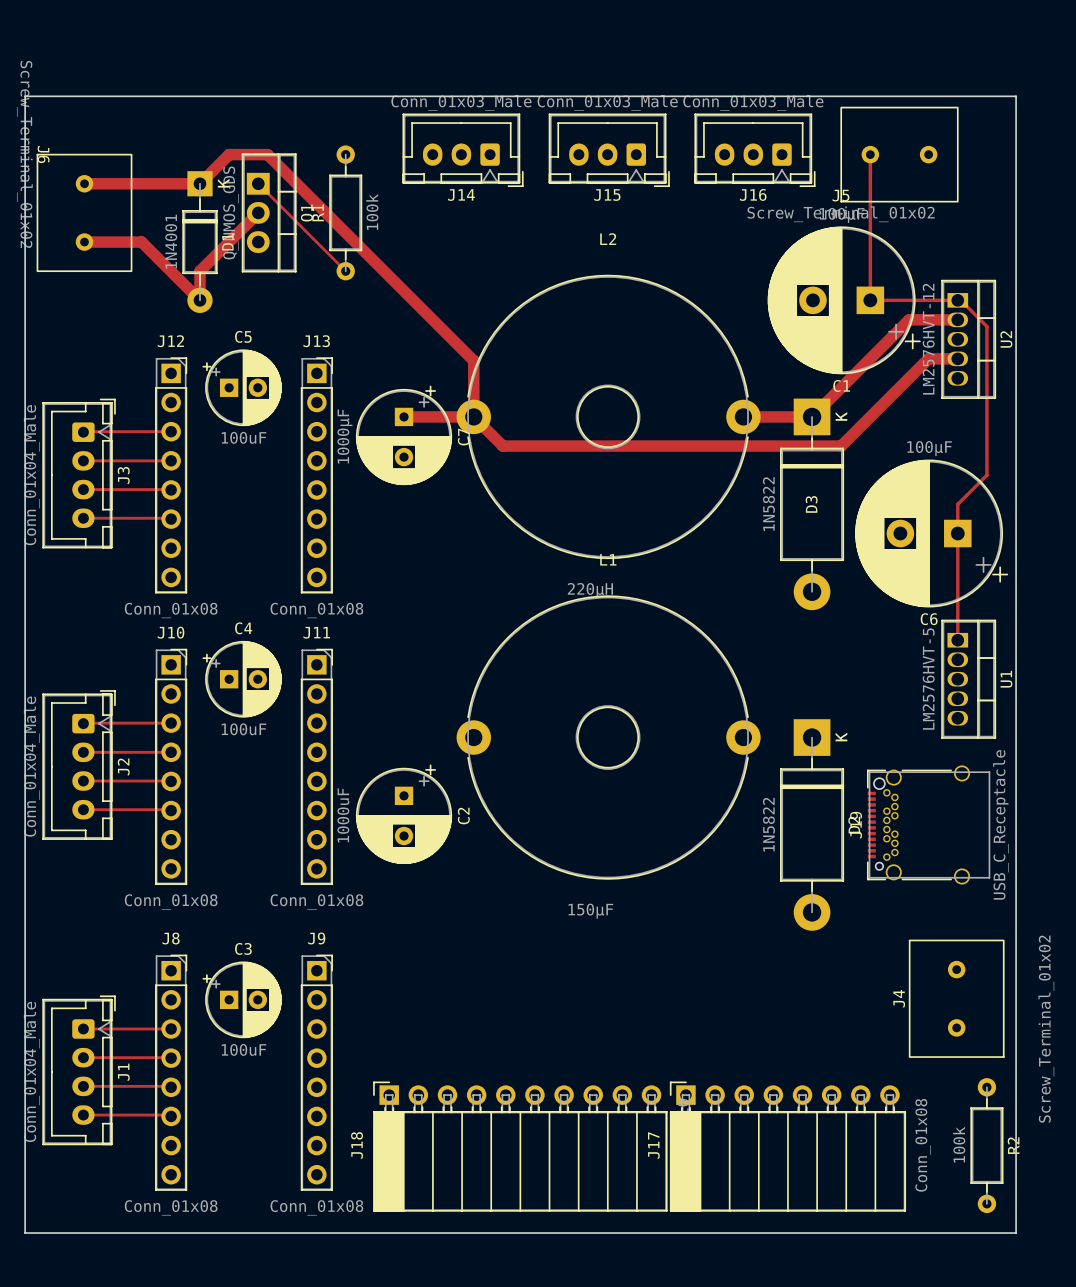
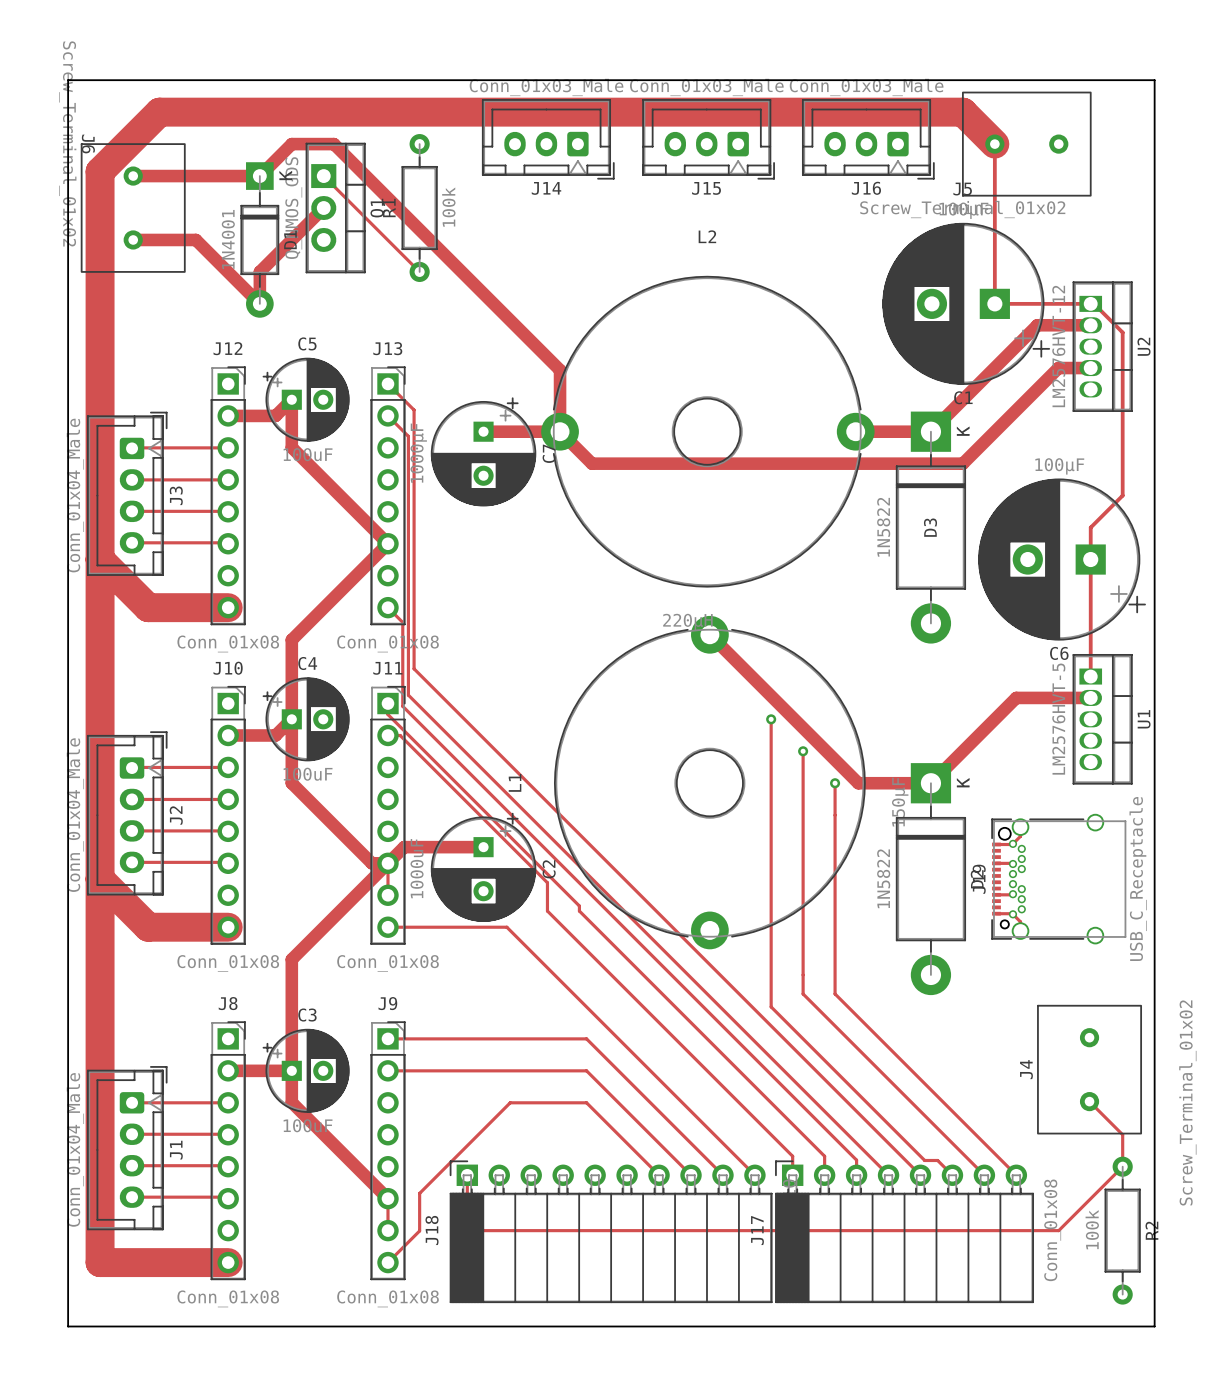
track: none -> (994, 144) (962, 112) (159, 112) (100, 171) (100, 1262) (228, 1262)
track: none -> (387, 383) (414, 410) (414, 668) (920, 1175)
track: none -> (228, 415) (275, 415) (291, 399) (291, 447) (387, 543) (291, 639) (291, 783) (371, 863) (387, 863) (387, 895)
track: none -> (387, 415) (408, 436) (408, 695) (888, 1175)
track: none -> (100, 559) (148, 607) (228, 607)
track: none -> (387, 607) (402, 622) (402, 706) (856, 1160) (856, 1175)
track: none -> (709, 634) (858, 783) (930, 783) (1016, 697) (1090, 697)
track: none -> (387, 703) (387, 714) (579, 906) (579, 911) (824, 1156) (824, 1175)
track: none -> (291, 719) (275, 735) (228, 735)
track: none -> (771, 719) (771, 1006) (924, 1160) (937, 1160) (952, 1175)
via: none -> (771, 719)
track: none -> (387, 735) (400, 735) (547, 882) (547, 911) (792, 1156) (792, 1175)
track: none -> (803, 751) (803, 993) (984, 1175)
via: none -> (803, 751)
L1 rotation: 0° (608, 737) -> 90° counterclockwise (709, 782)
track: none -> (835, 783) (835, 993) (1016, 1175)
via: none -> (835, 783)
track: none -> (1020, 827) (1020, 836) (1012, 844) (996, 844)
track: none -> (483, 847) (404, 847) (291, 959) (291, 1102) (387, 1198) (387, 1230)
track: none -> (996, 863) (1012, 864)
track: none -> (100, 879) (148, 927) (228, 927)
track: none -> (1012, 894) (996, 894)
track: none -> (996, 913) (1012, 913) (1020, 921) (1020, 931)
track: none -> (387, 927) (506, 927) (754, 1175)
track: none -> (387, 1038) (586, 1038) (722, 1175)
track: none -> (228, 1070) (291, 1070)
track: none -> (387, 1070) (586, 1070) (691, 1175)
track: none -> (1091, 1103) (1122, 1134) (1122, 1166) (1058, 1230) (483, 1230) (467, 1214) (467, 1175)
track: none -> (659, 1175) (586, 1102) (510, 1102) (419, 1193) (419, 1230) (387, 1262)

